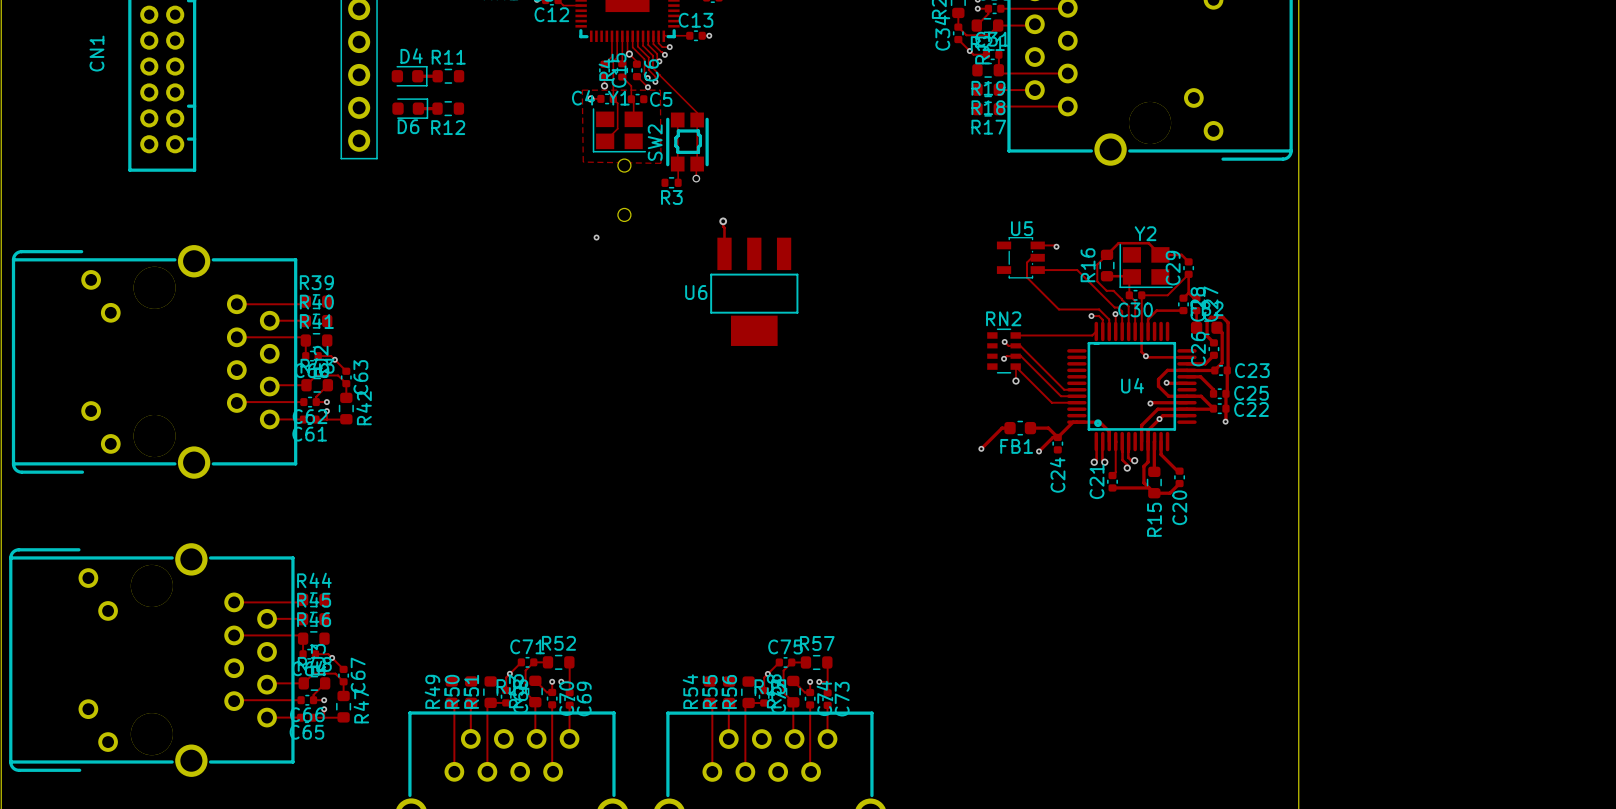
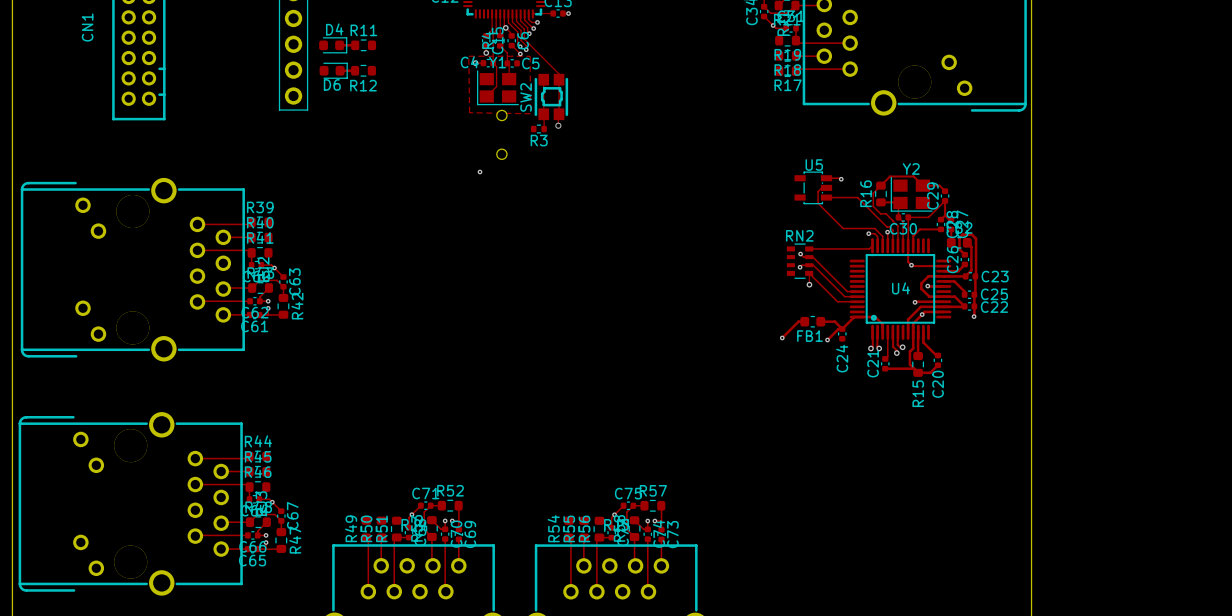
track: (723, 221) (724, 253) -> none
via: (723, 221) -> none
U6: (754, 291) -> none

